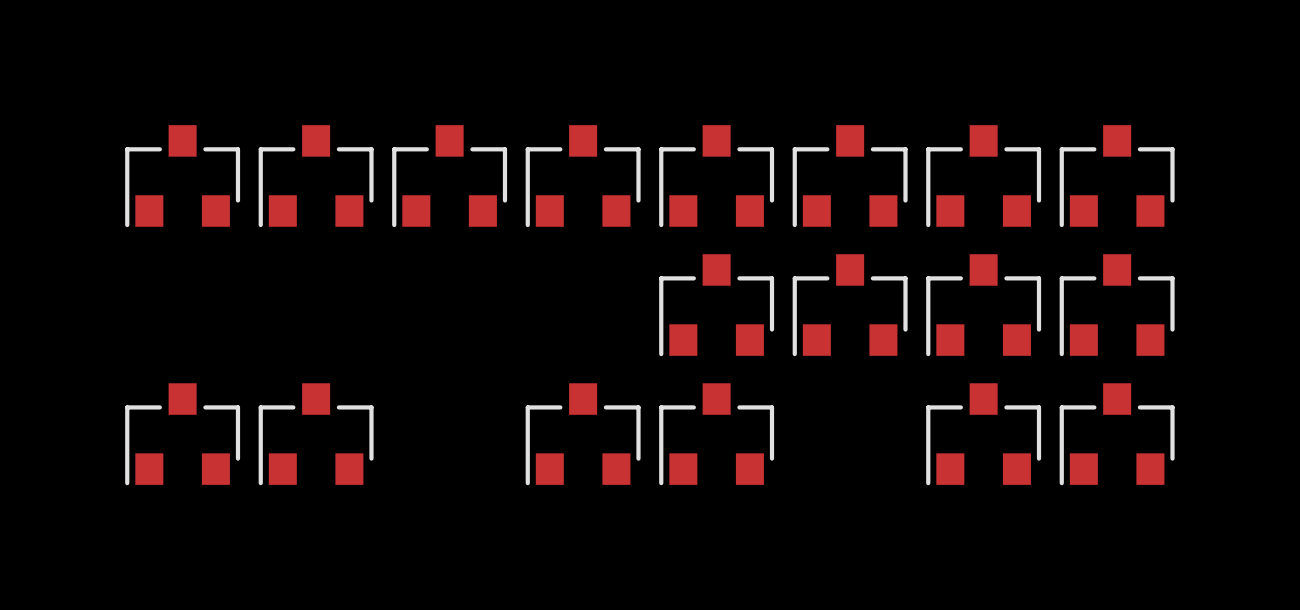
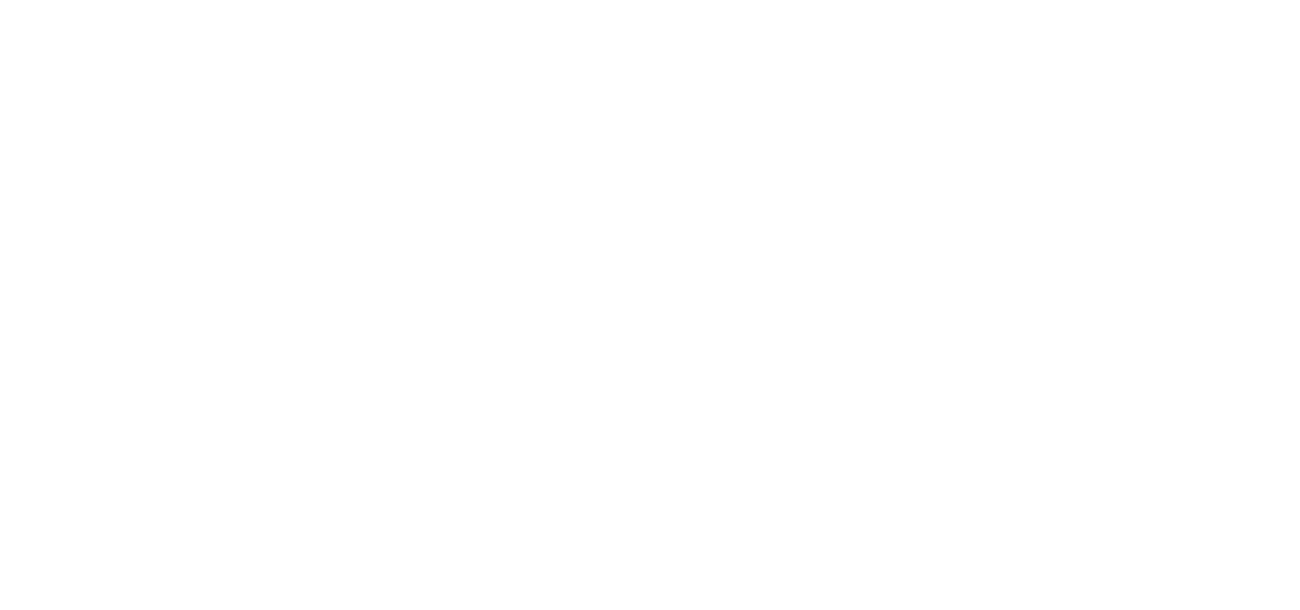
part: (182, 176) -> none
part: (316, 176) -> none
part: (449, 176) -> none
part: (583, 176) -> none
part: (716, 176) -> none
part: (850, 176) -> none
part: (983, 176) -> none
part: (1117, 176) -> none
part: (716, 305) -> none
part: (850, 305) -> none
part: (983, 305) -> none
part: (1117, 305) -> none
part: (182, 434) -> none
part: (316, 434) -> none
part: (583, 434) -> none
part: (716, 434) -> none
part: (983, 434) -> none
part: (1117, 434) -> none

